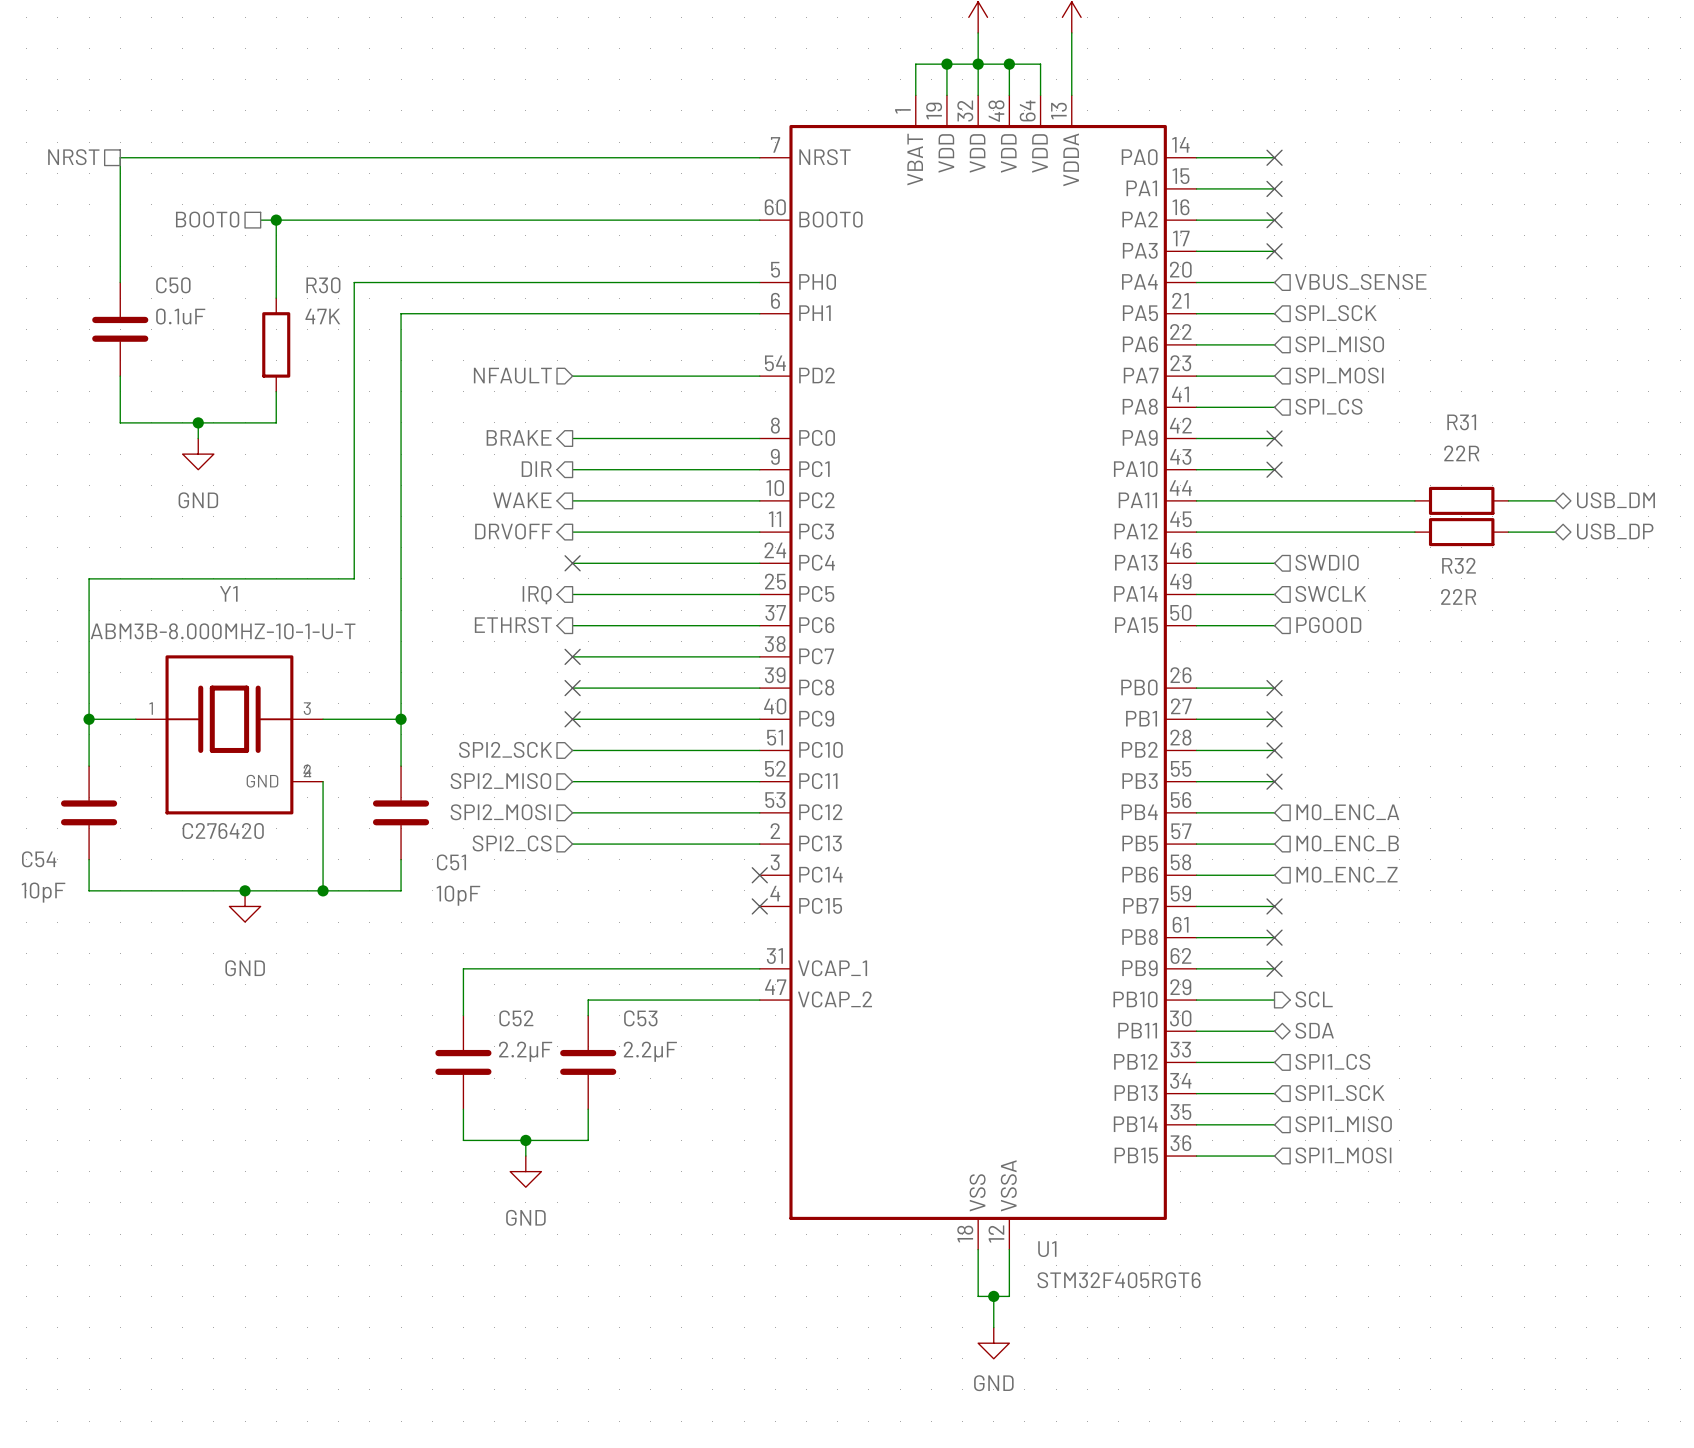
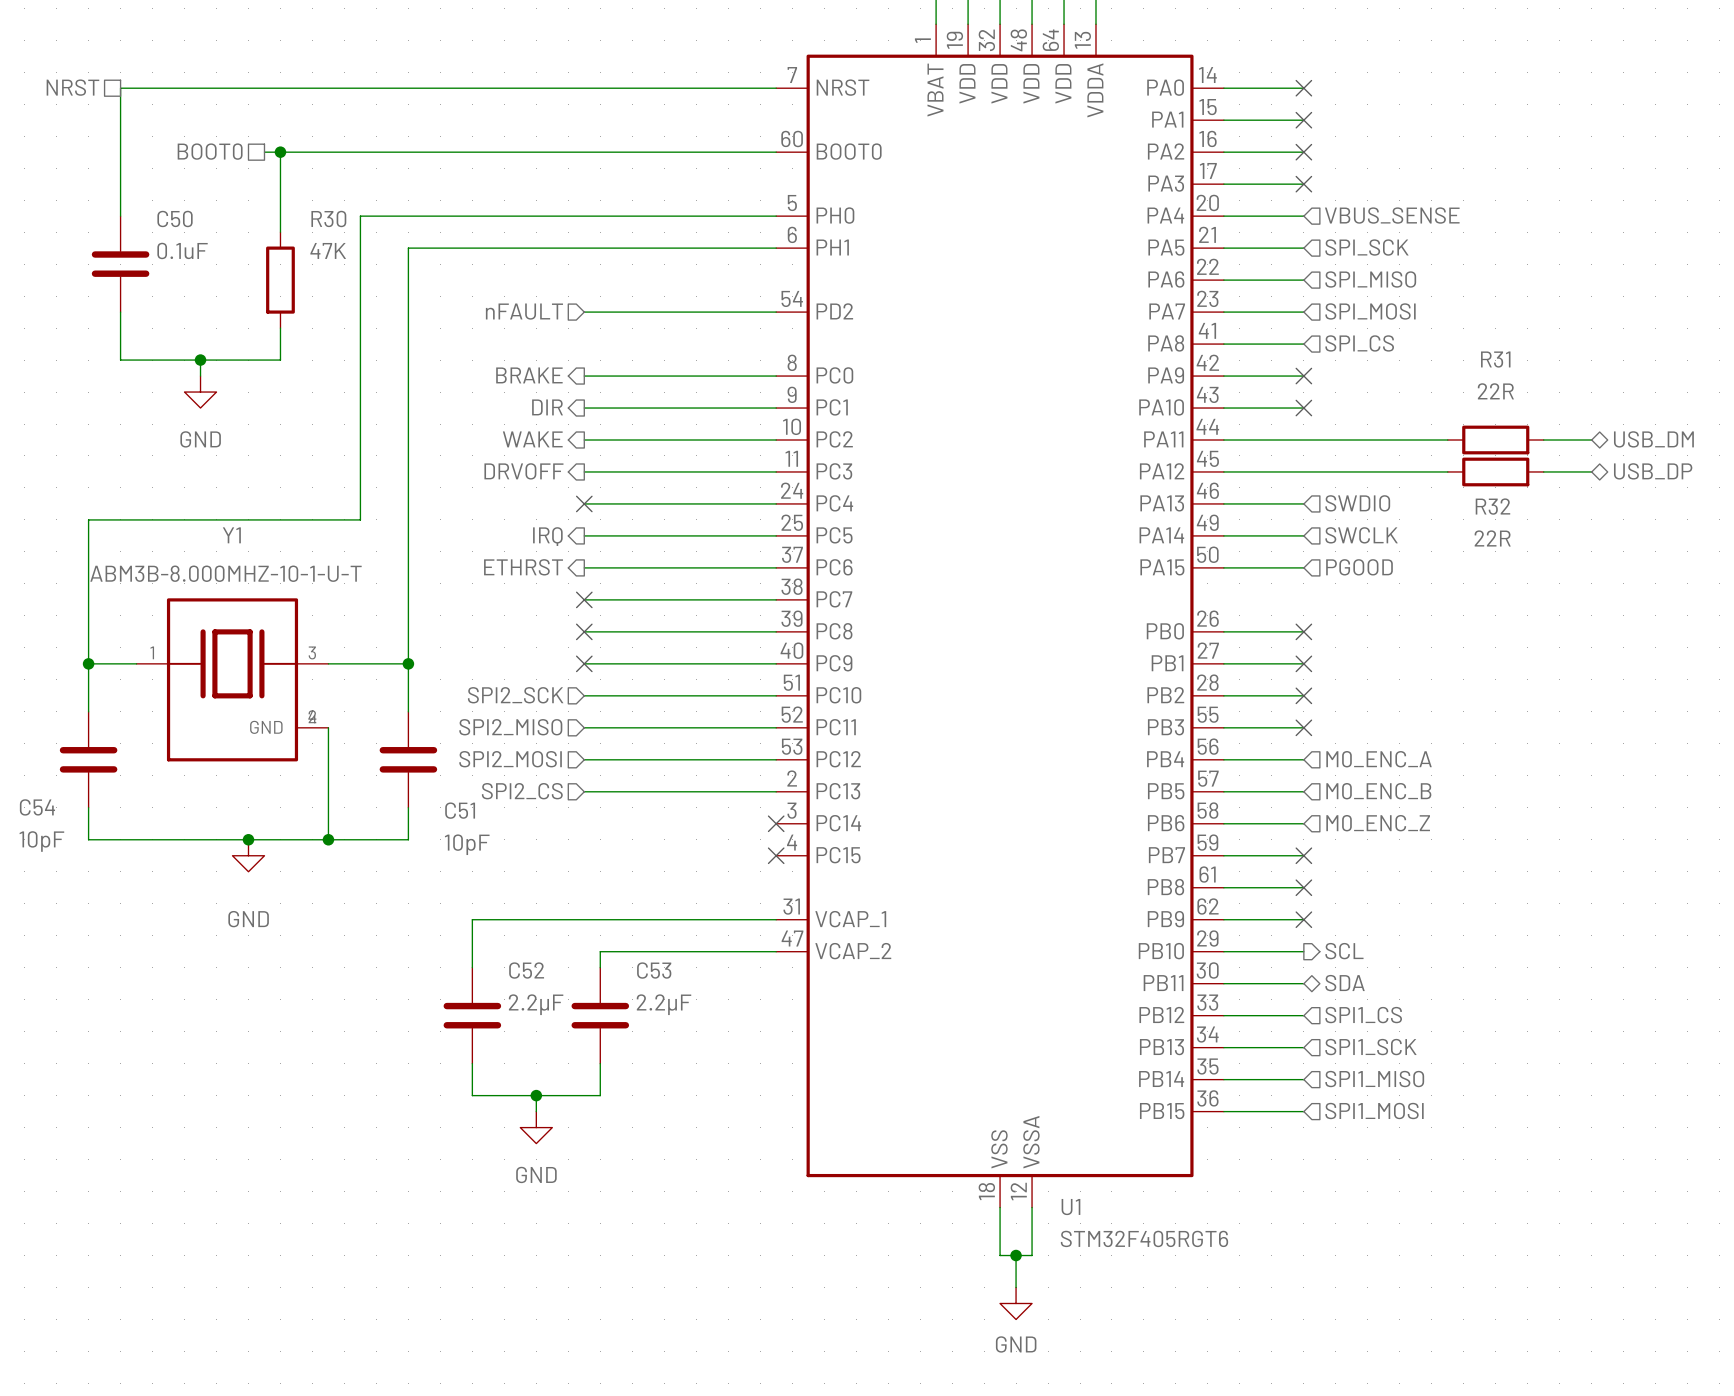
hierarchical label: NFAULT (512, 375) -> nFAULT (524, 311)
Y1 text: C276420 (223, 831) -> none

